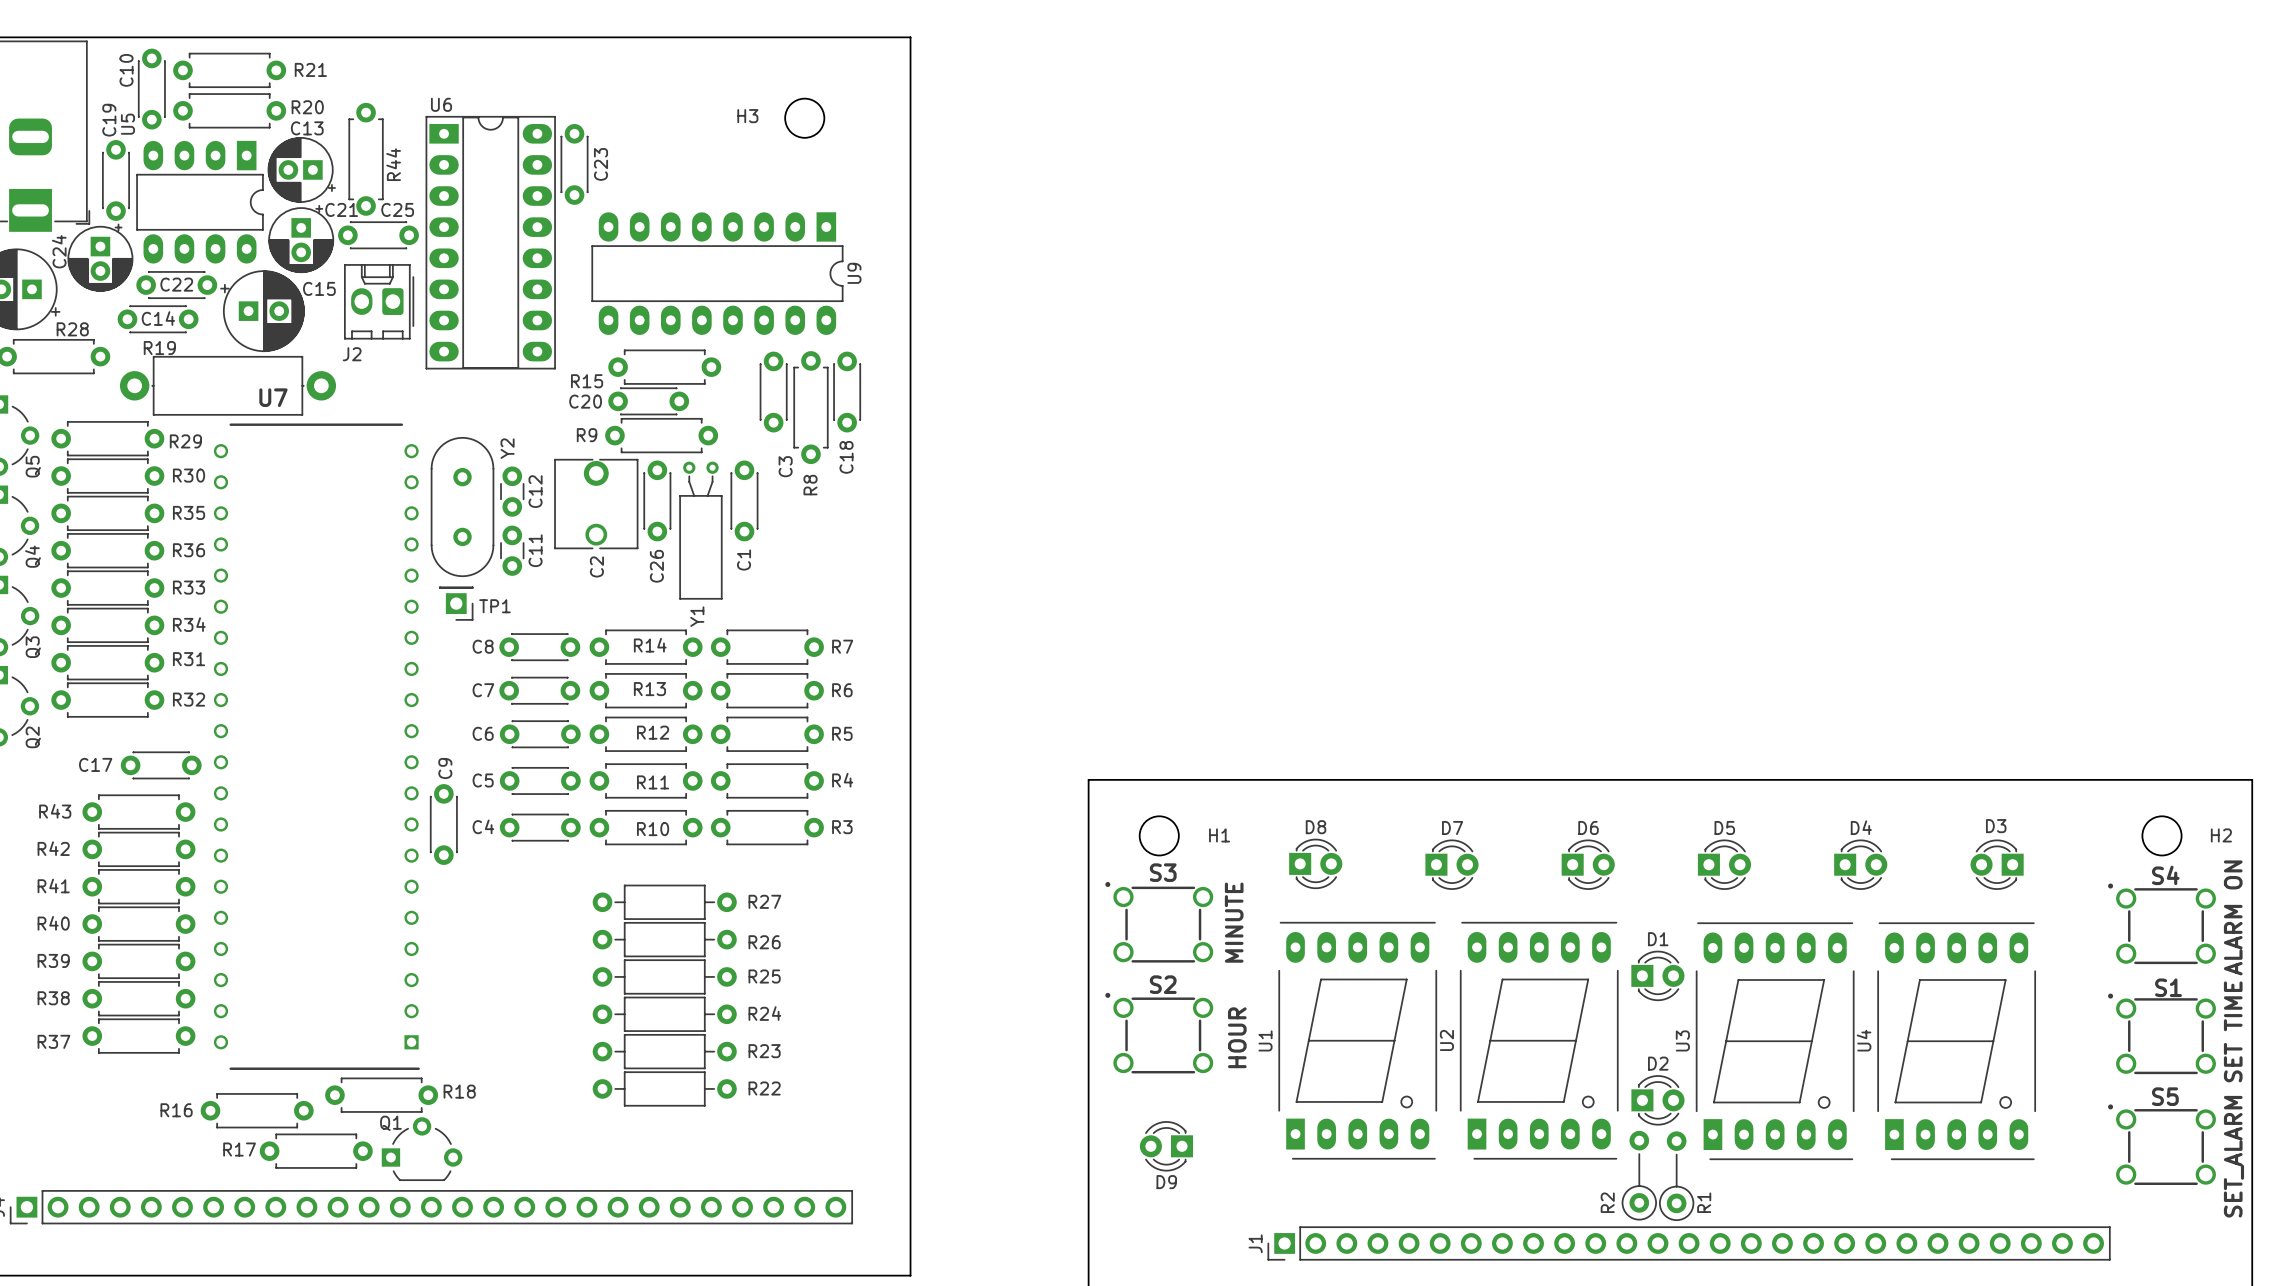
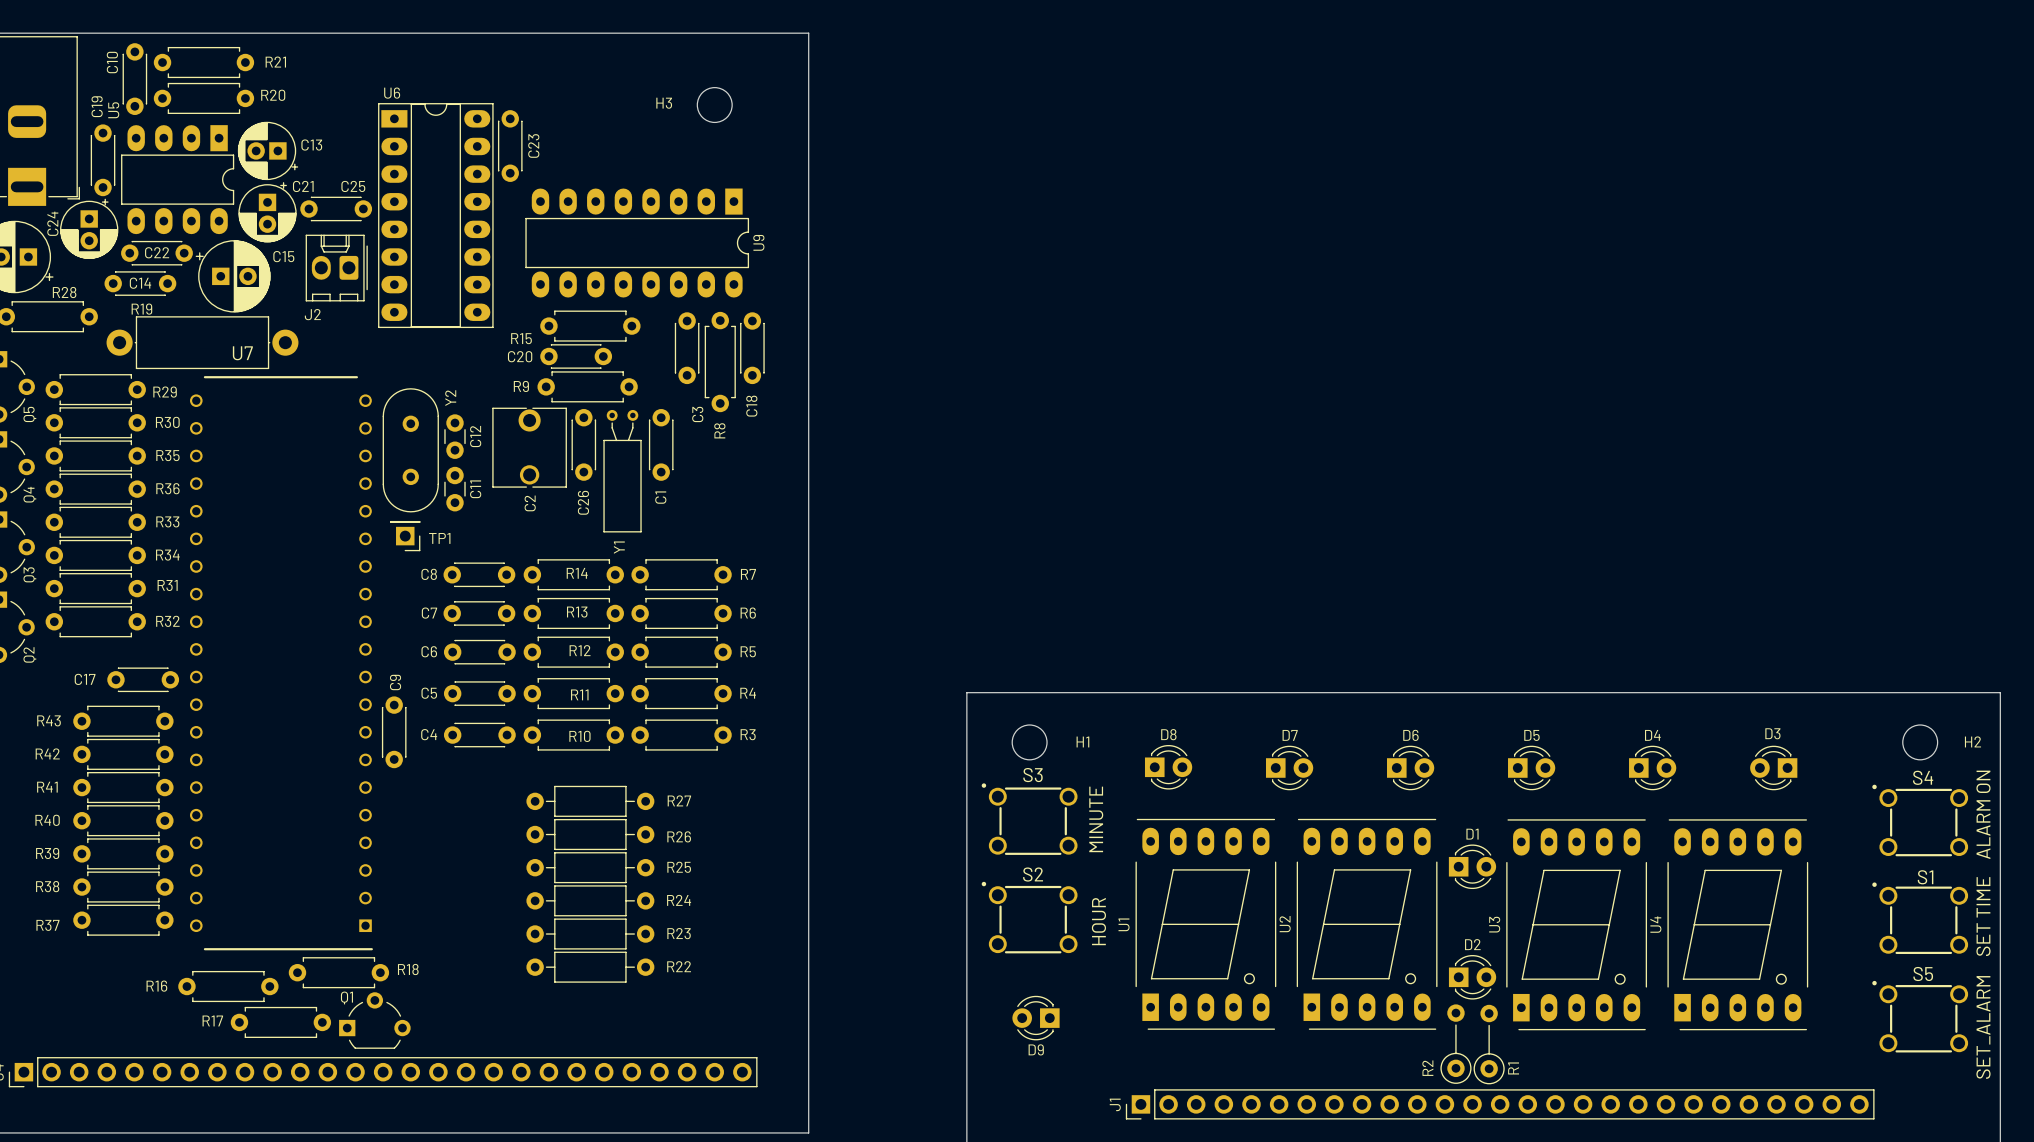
C13 name position: C13 (307, 128) -> C13 (311, 145)
R44: (366, 159) -> none

